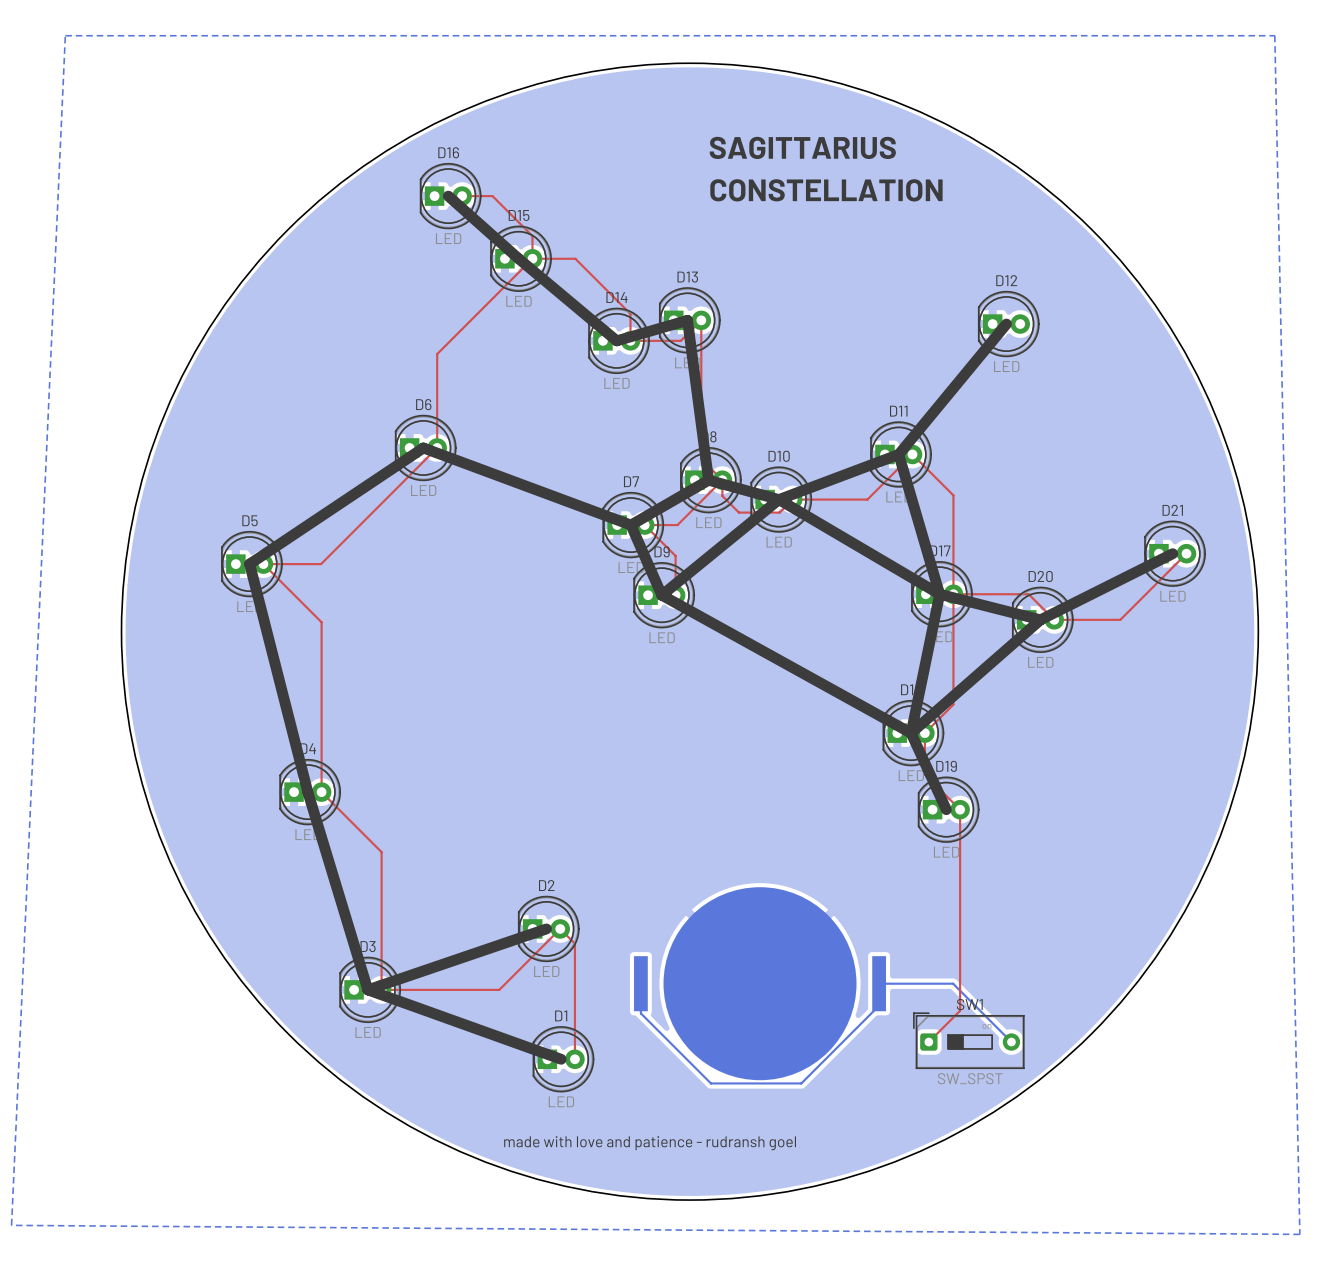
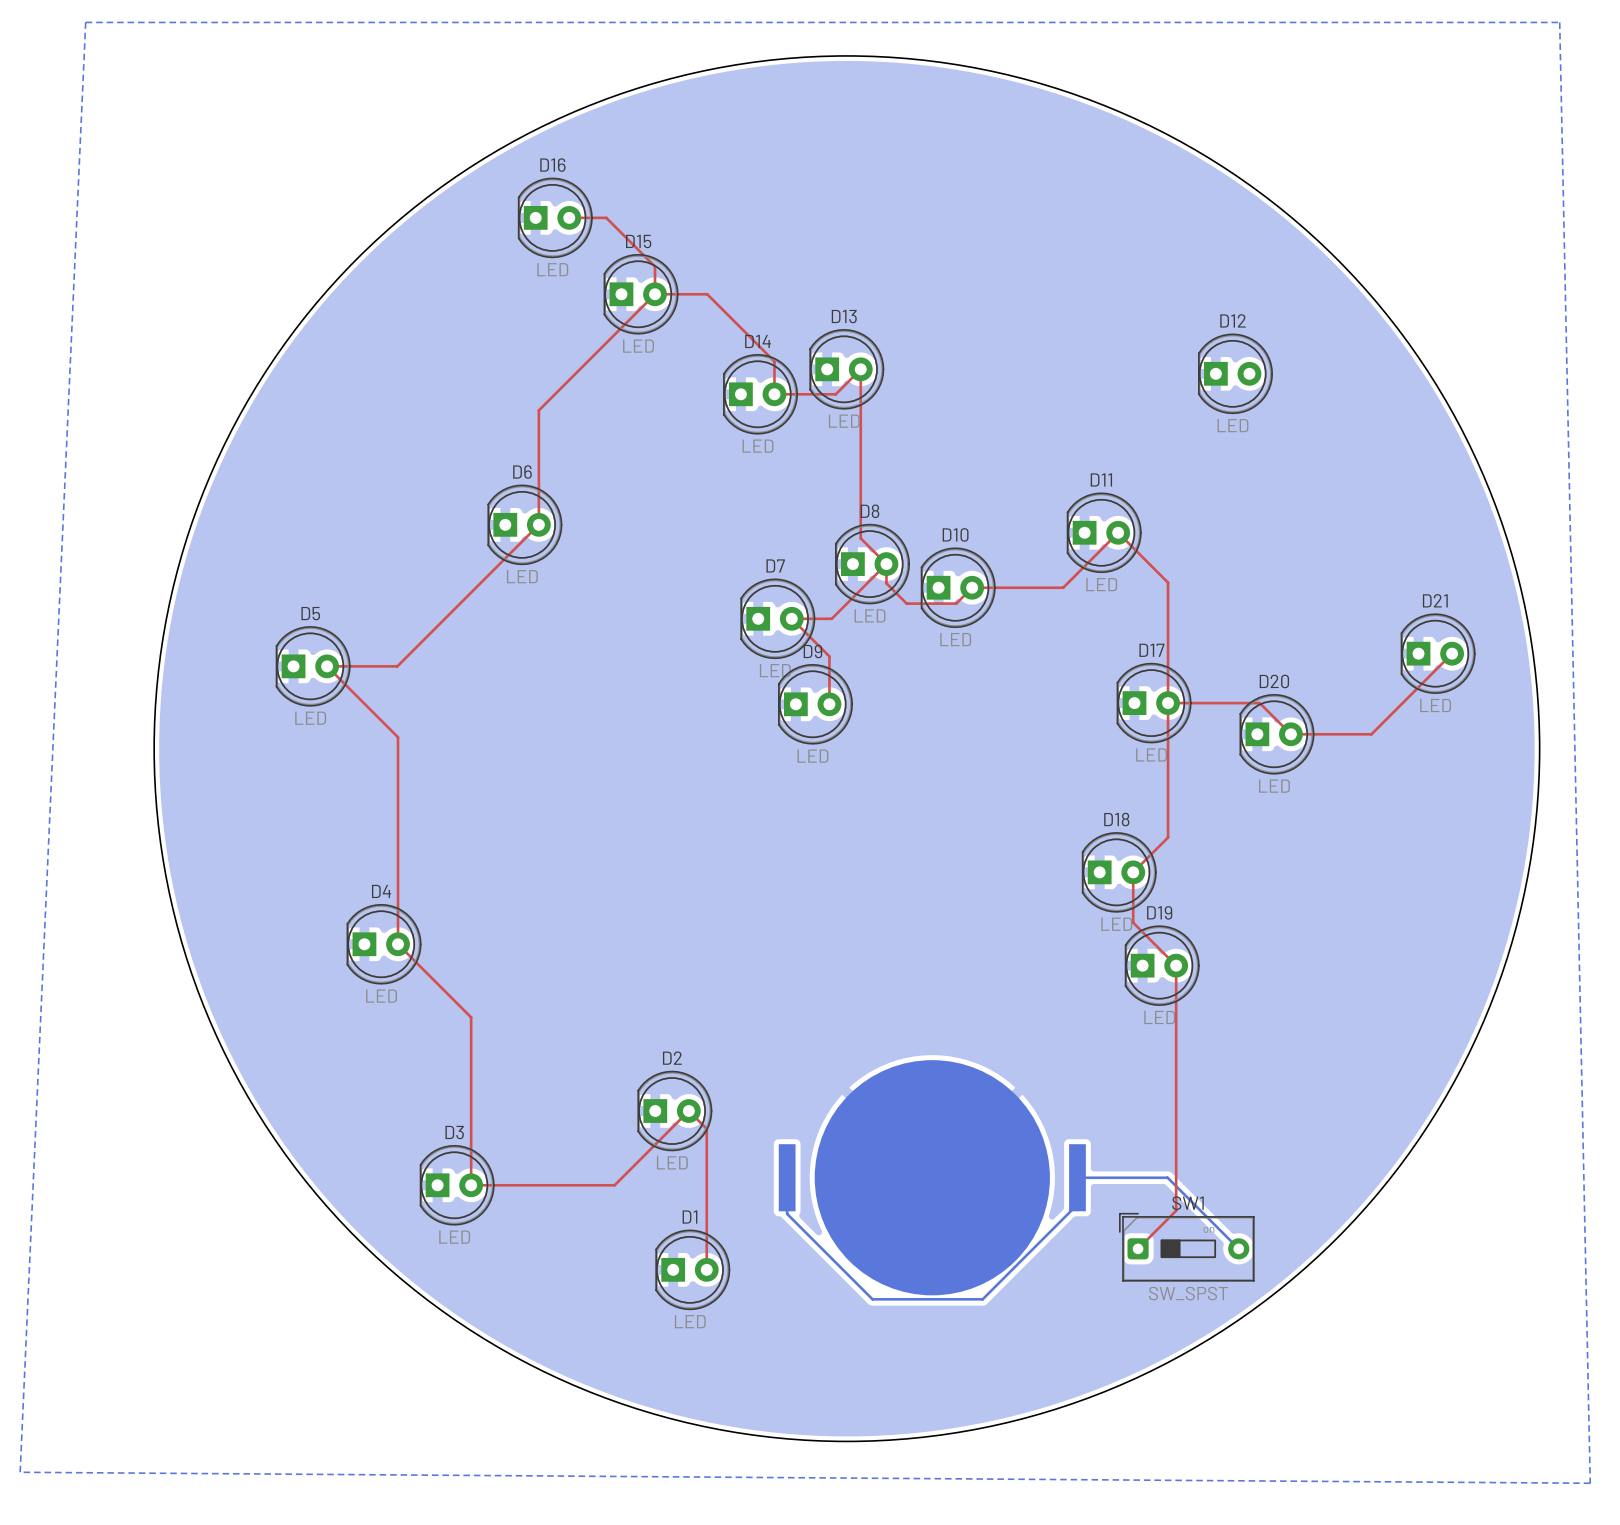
text: SAGITTARIUS (802, 147) -> none
text: CONSTELLATION (826, 190) -> none
line: (448, 196) (518, 258) (616, 340) (687, 320) (708, 480) -> none
line: (1006, 324) (898, 454) -> none
line: (898, 454) (778, 499) -> none
line: (898, 454) (939, 594) -> none
line: (708, 480) (630, 525) -> none
line: (708, 480) (778, 499) -> none
line: (778, 499) (661, 595) -> none
line: (778, 499) (939, 594) -> none
line: (630, 525) (423, 447) (249, 564) (307, 792) (367, 989) -> none
line: (630, 525) (661, 595) -> none
line: (1172, 553) (1040, 619) -> none
line: (939, 594) (911, 733) -> none
line: (939, 594) (1040, 619) -> none
line: (661, 595) (911, 733) -> none
line: (1040, 619) (911, 733) -> none
line: (911, 733) (946, 809) -> none
line: (546, 928) (367, 989) -> none
line: (367, 989) (561, 1059) -> none
text: made with love and patience - rudransh goel (650, 1143) -> none

